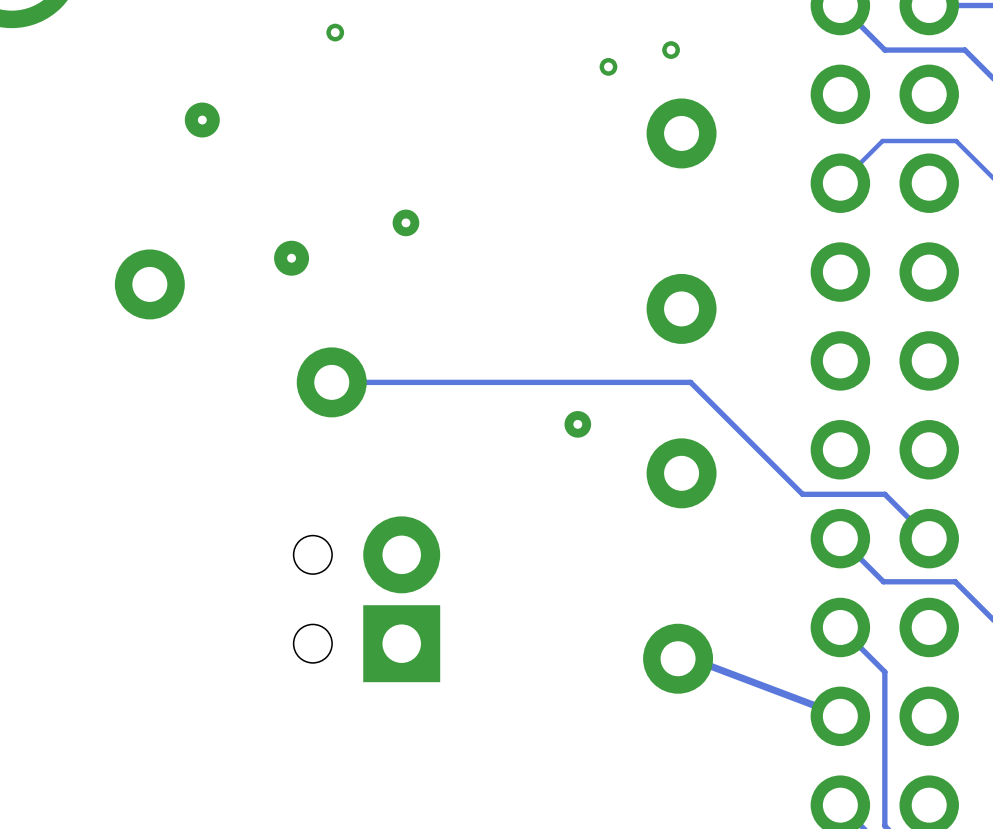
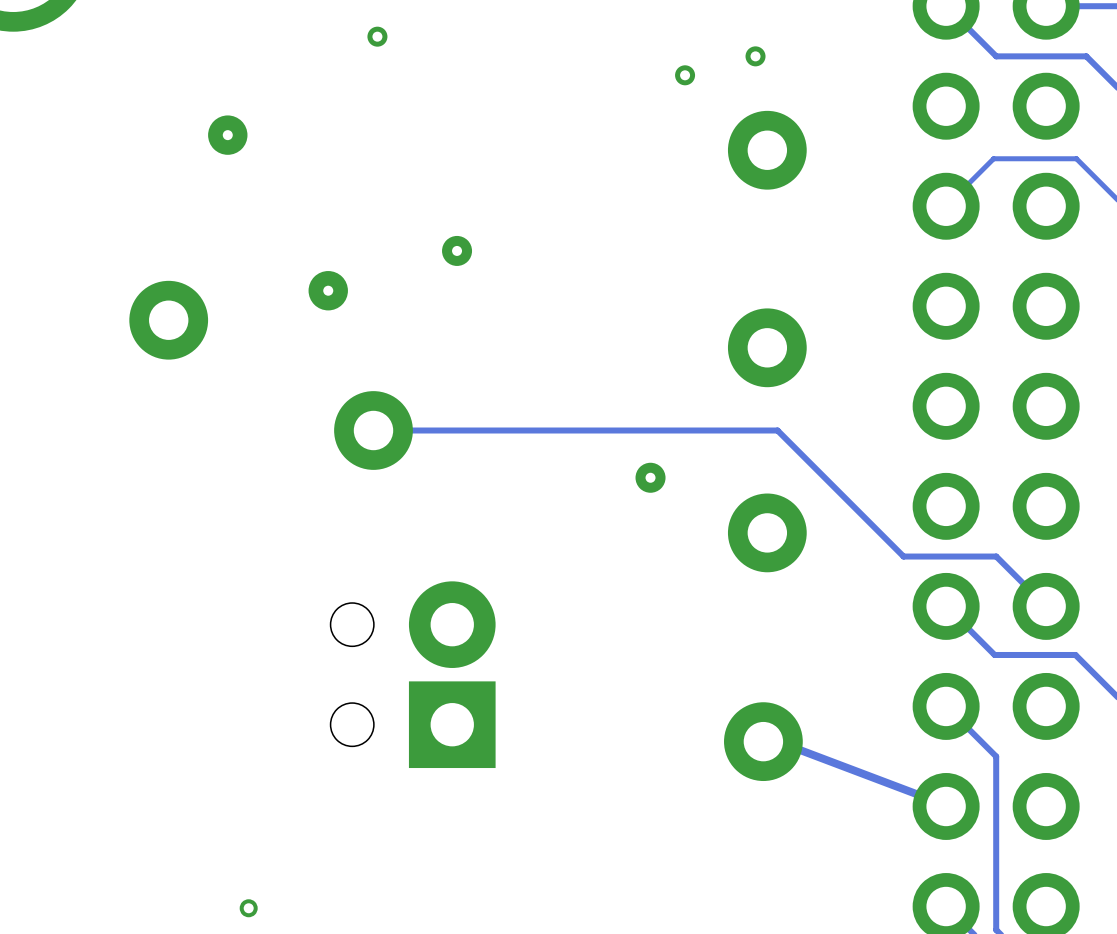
via: none -> (248, 908)

